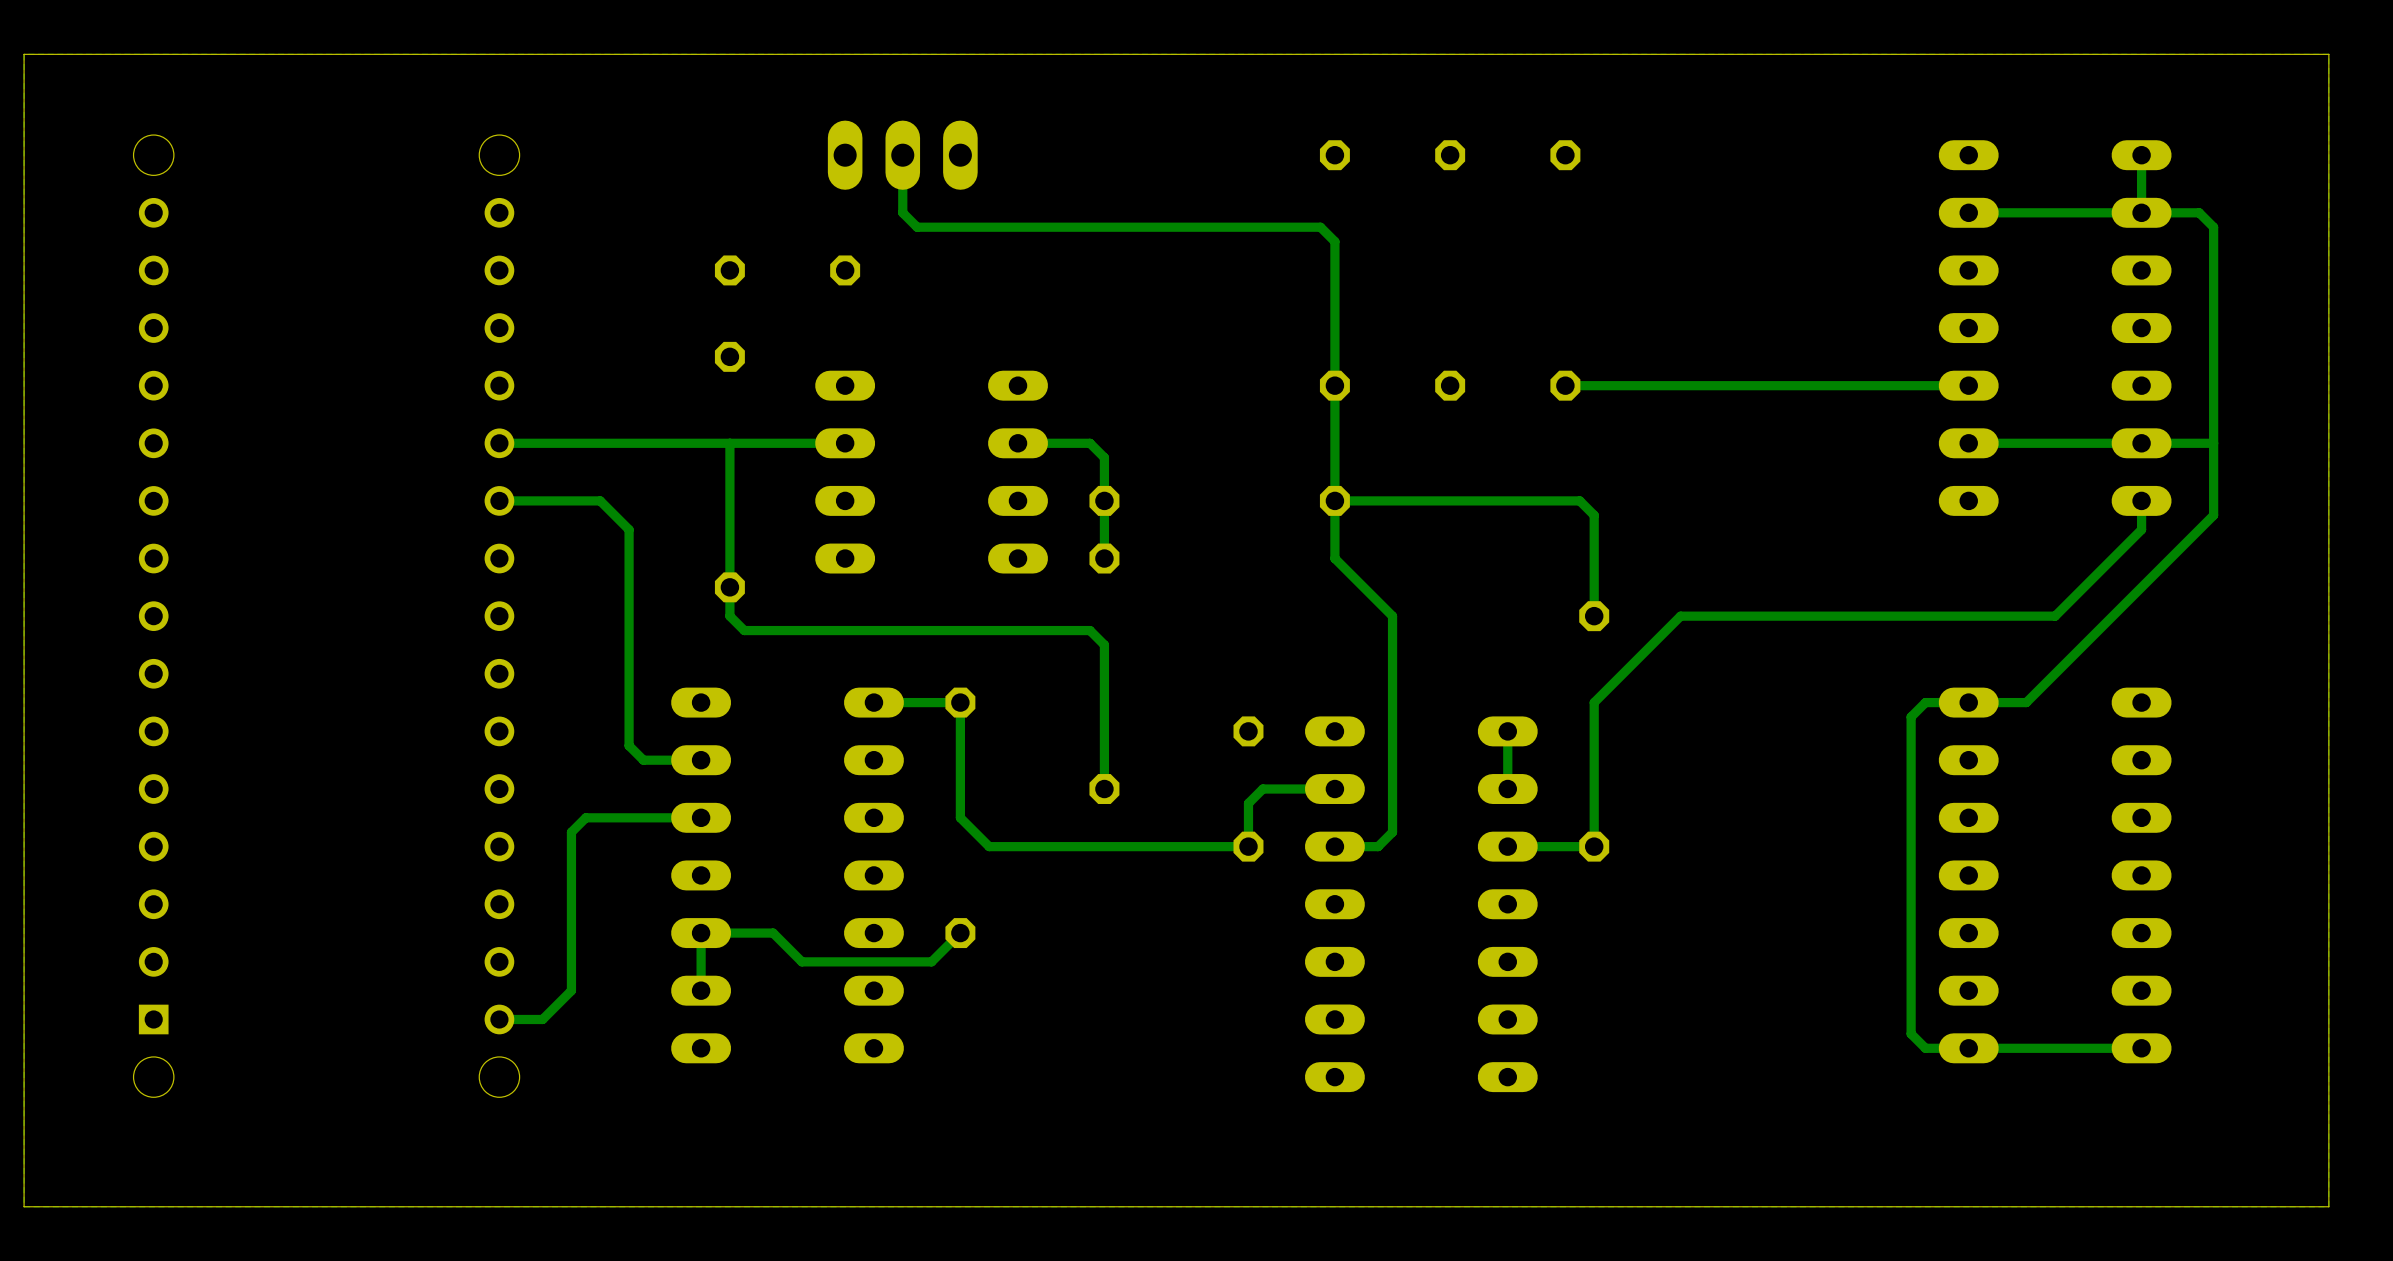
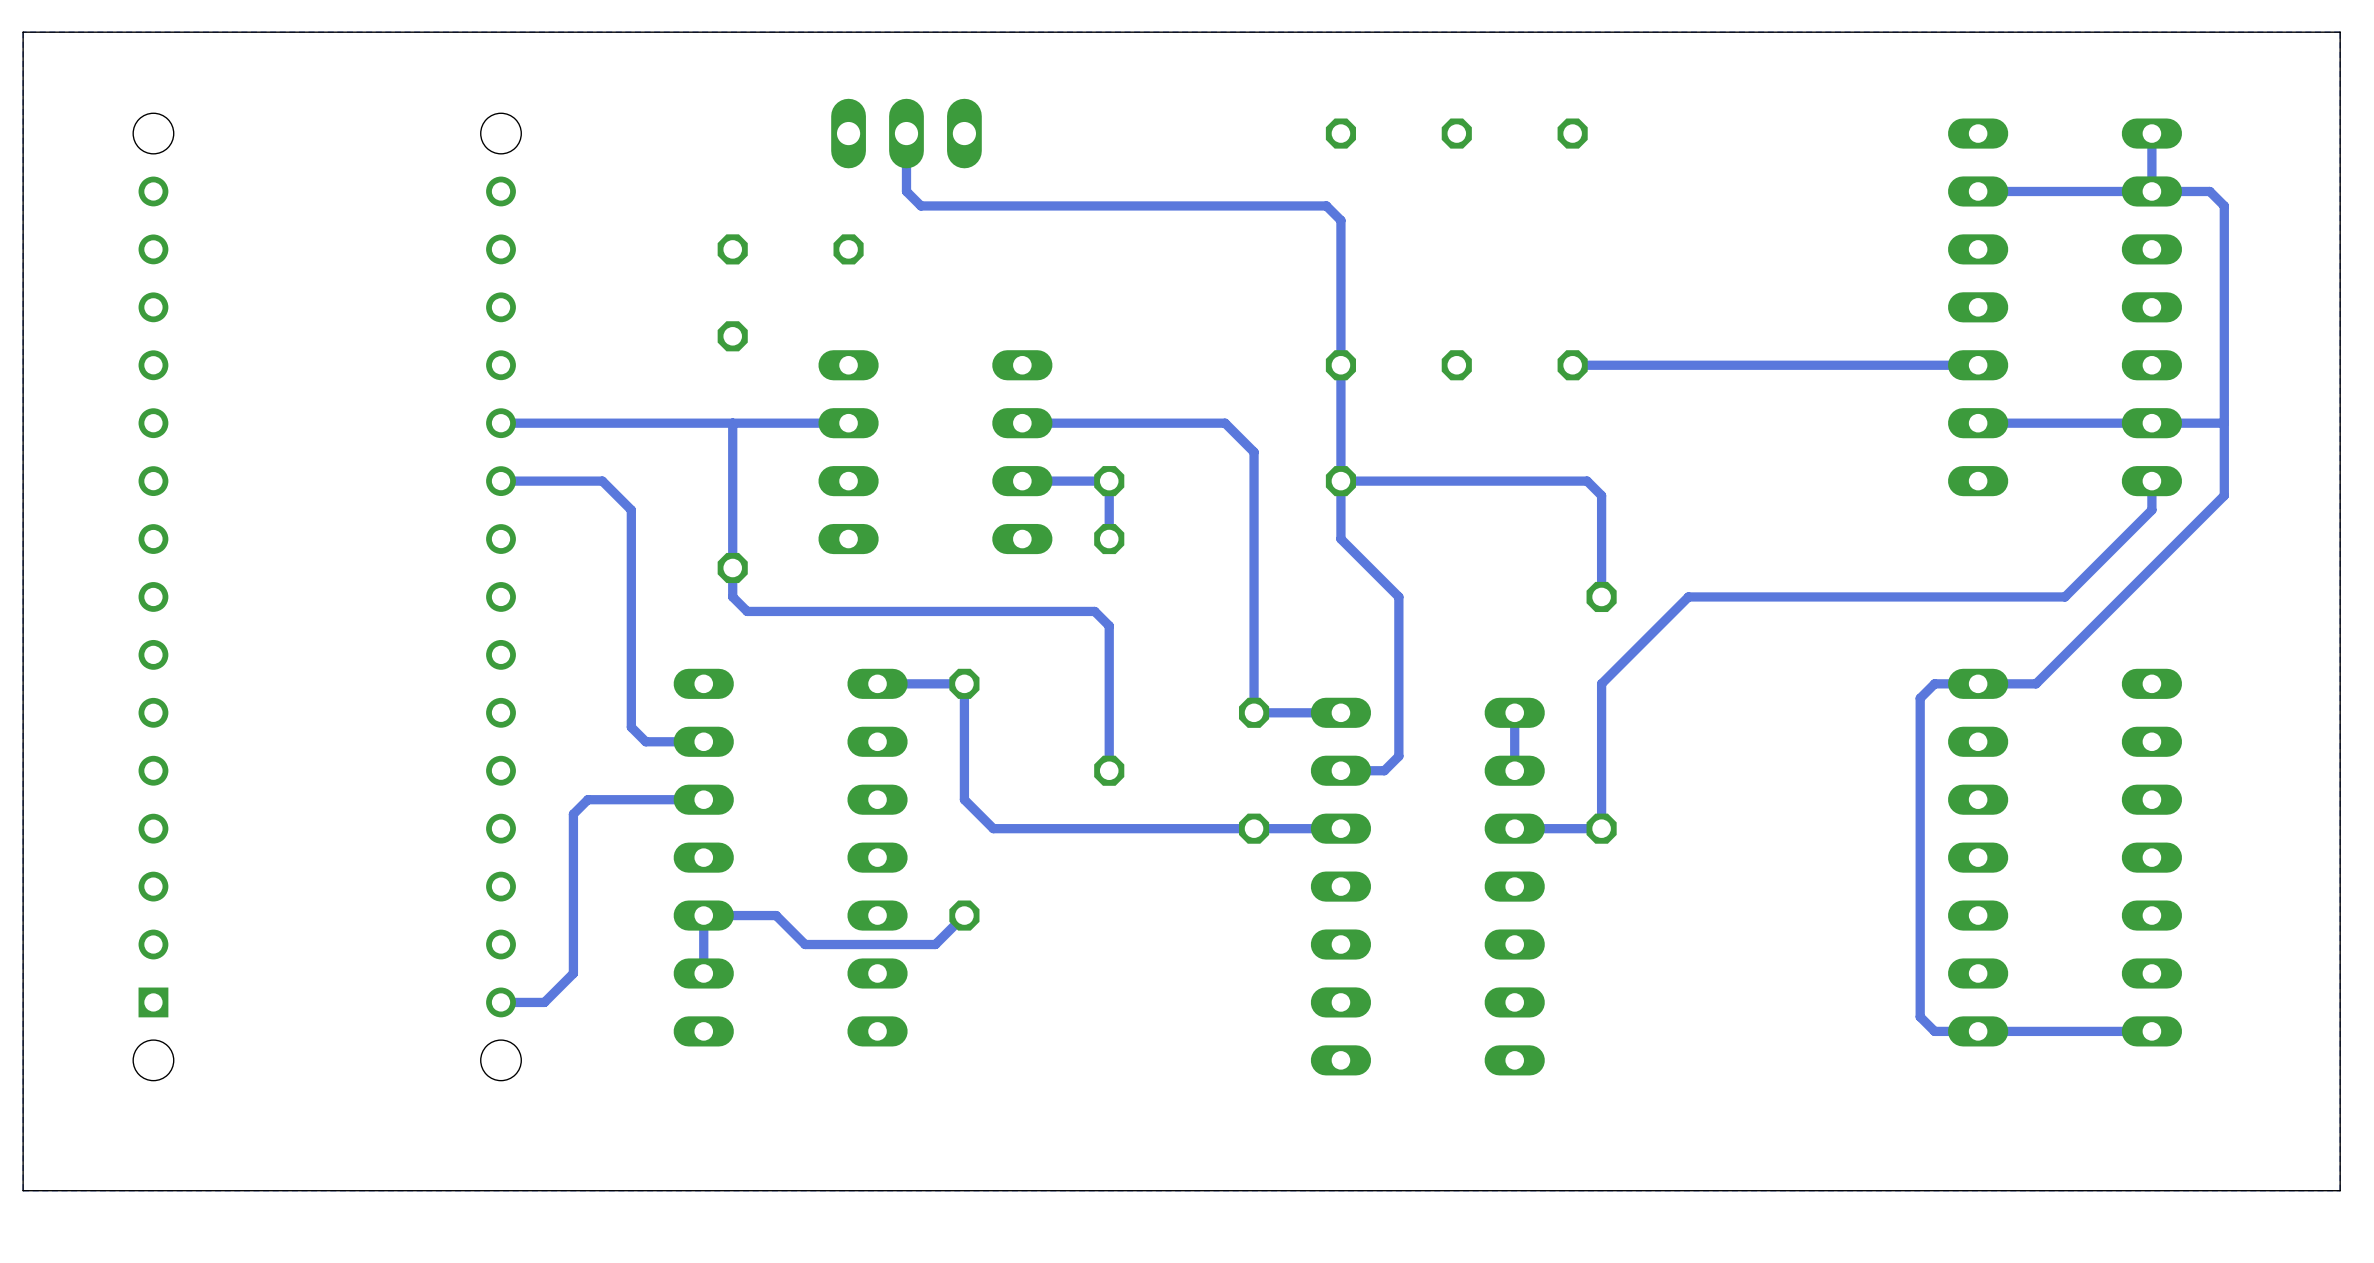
track: (1090, 443) (1104, 457) (1104, 500) -> (1022, 481) (1109, 481)
track: none -> (1094, 423) (1225, 423) (1254, 452) (1254, 712) (1340, 712)
track: (1392, 774) (1392, 832) (1378, 846) (1334, 846) -> (1398, 756) (1384, 770) (1340, 770)
track: (1334, 789) (1262, 789) (1248, 803) (1248, 846) -> (1340, 828) (1254, 828)

